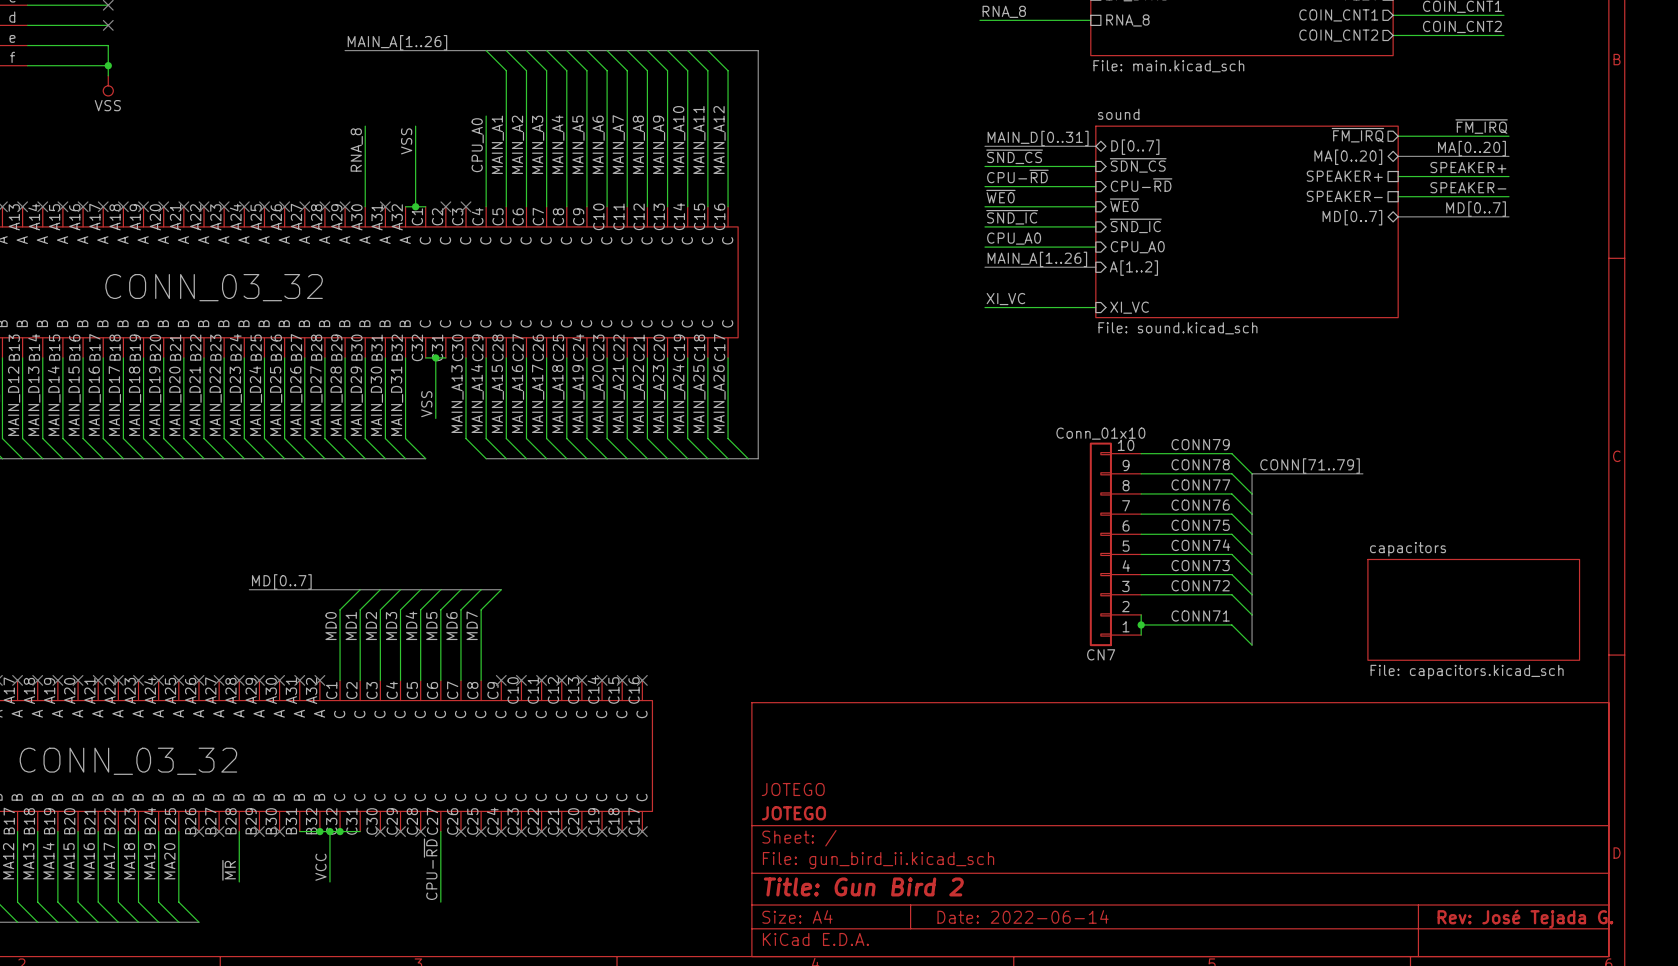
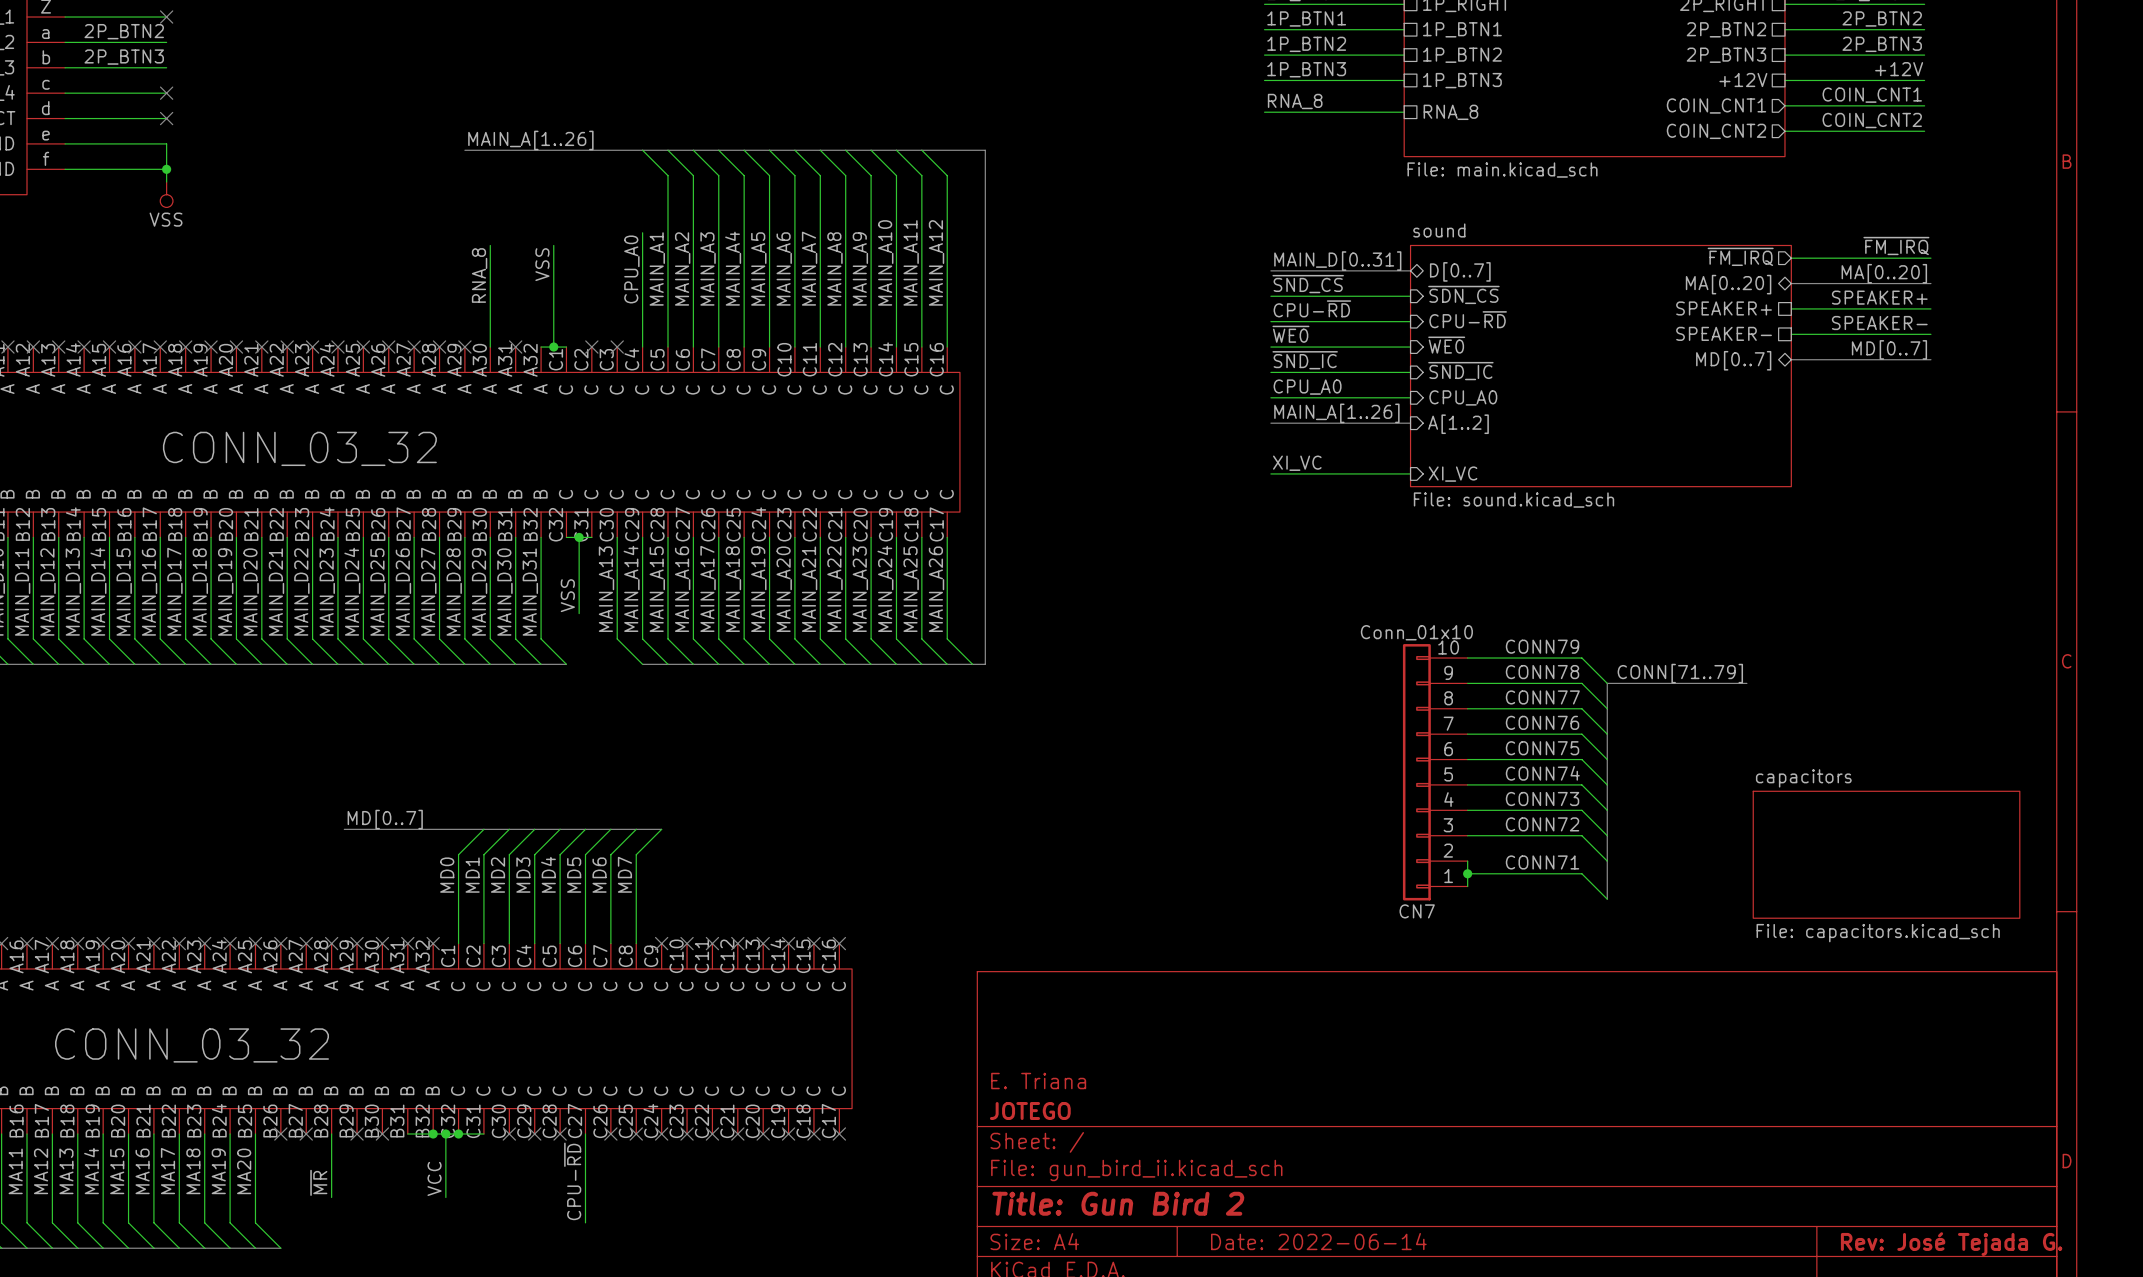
title block: JOTEGO (793, 789) -> E. Triana (1038, 1081)

